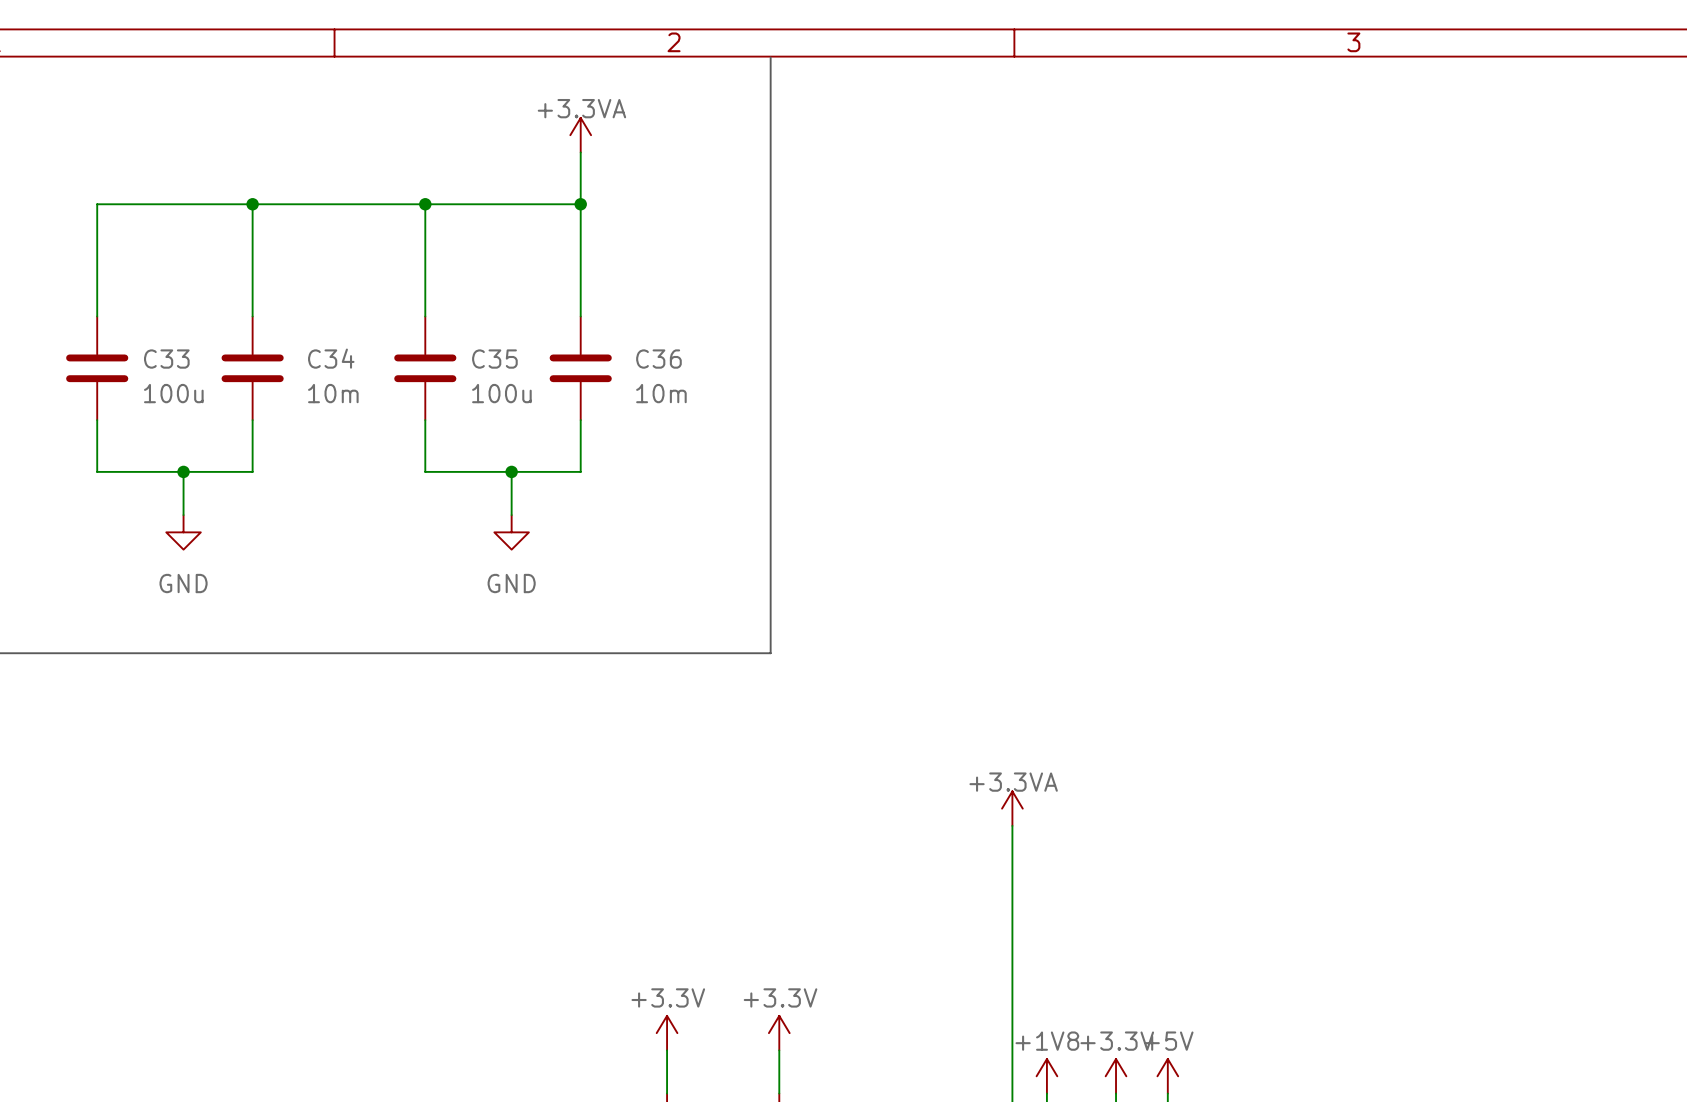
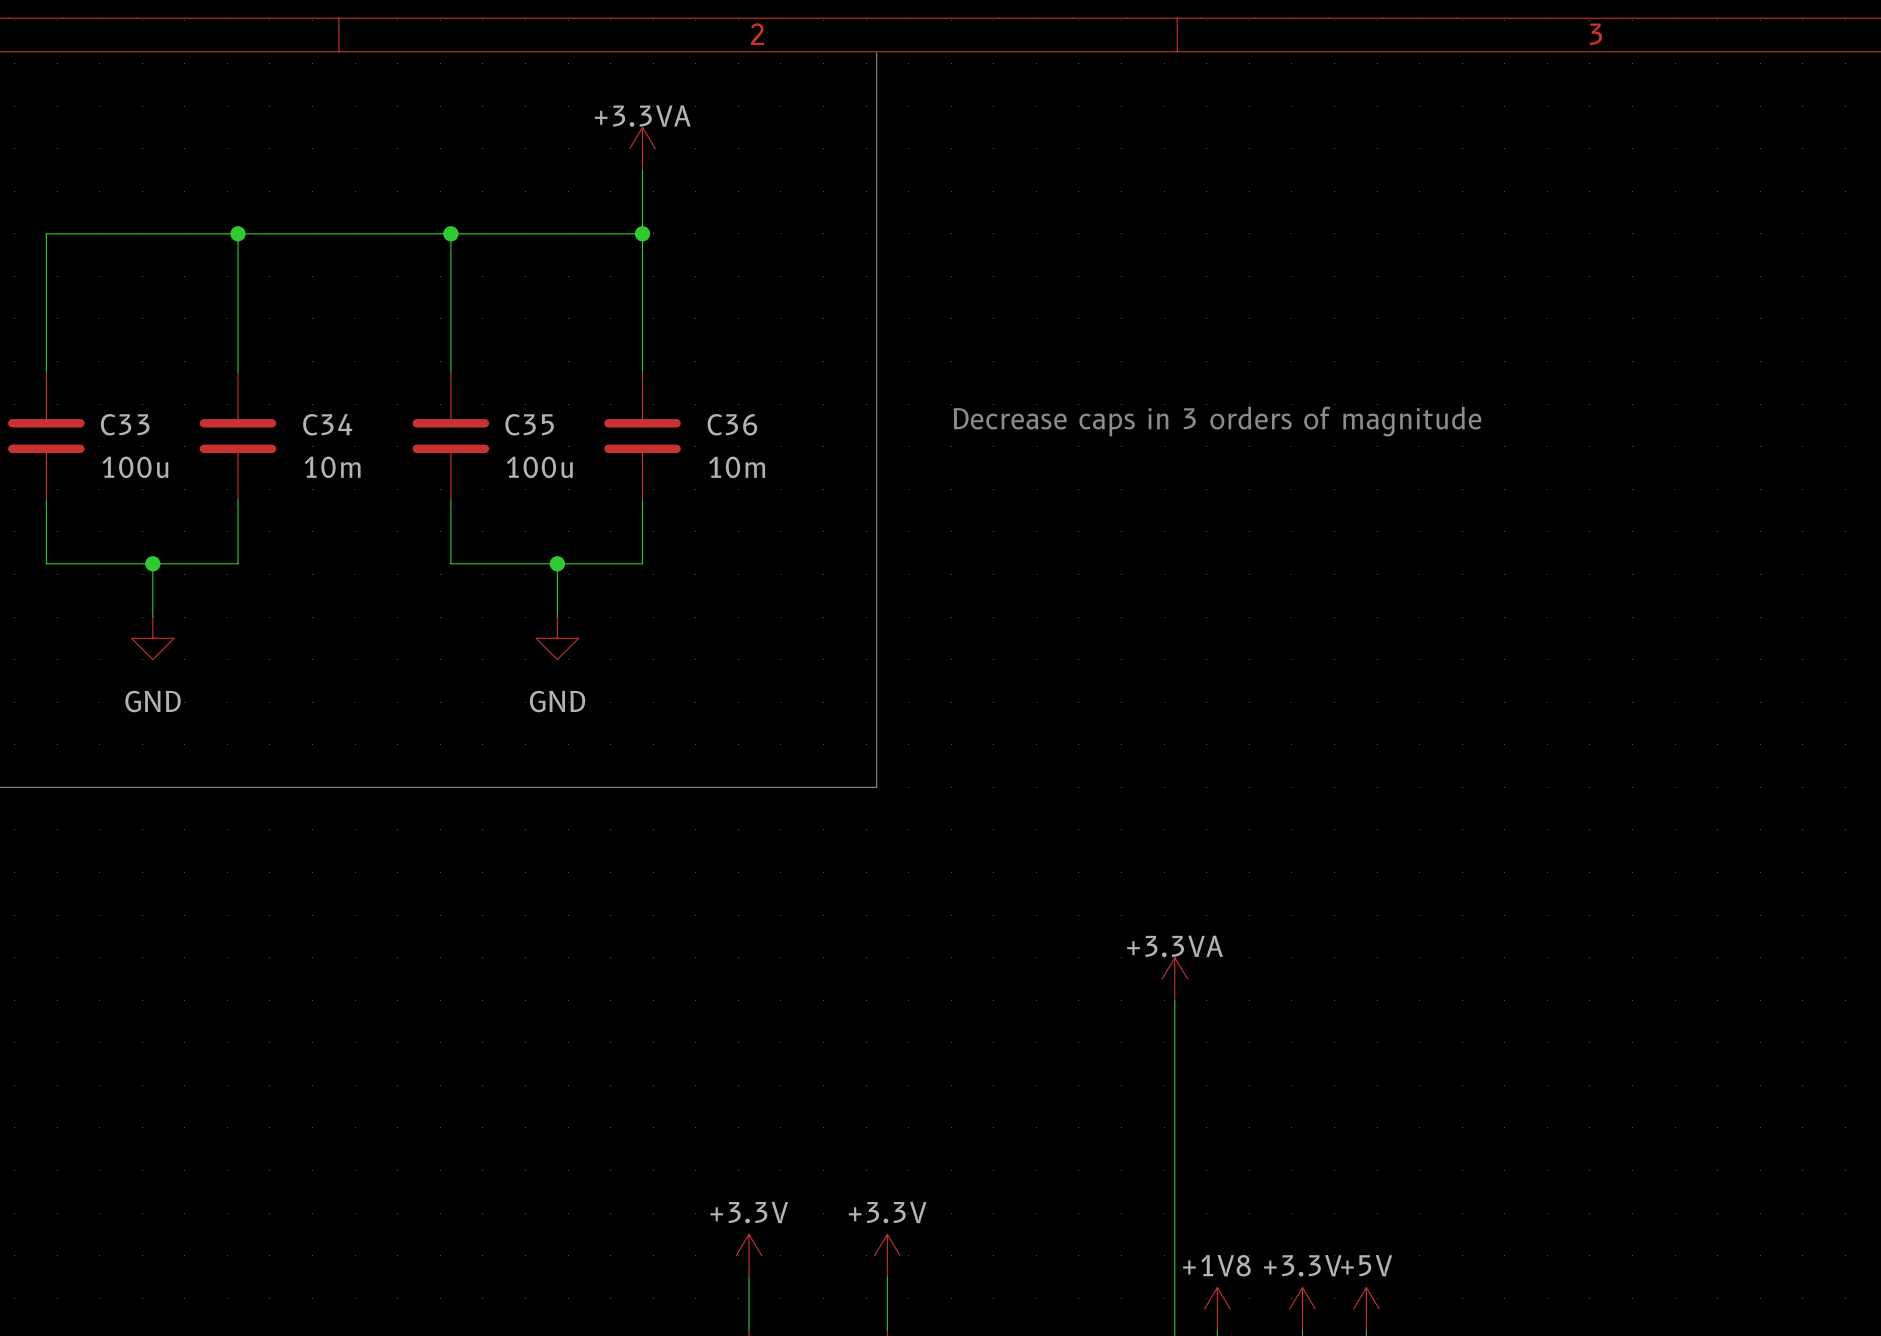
text: none -> Decrease caps in 3 orders of magnitude (1217, 421)

